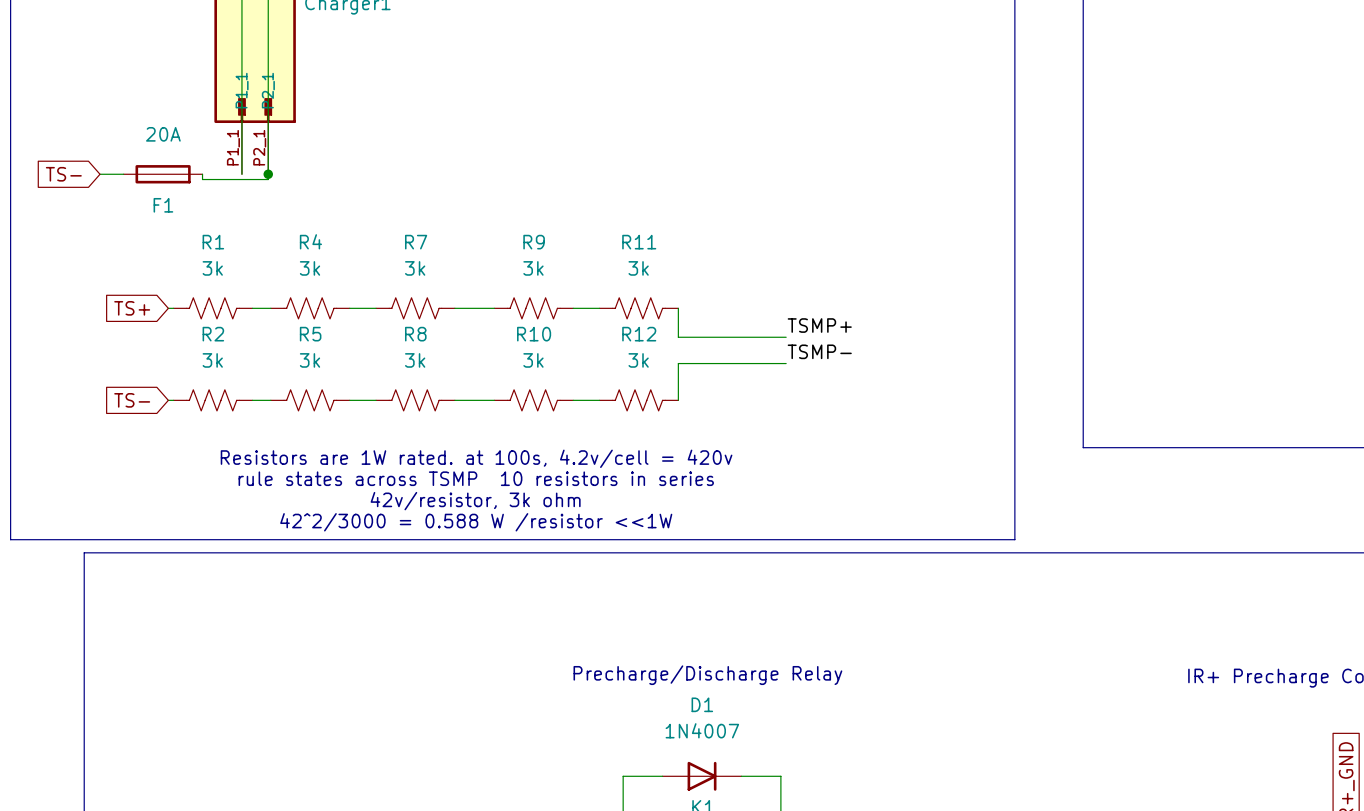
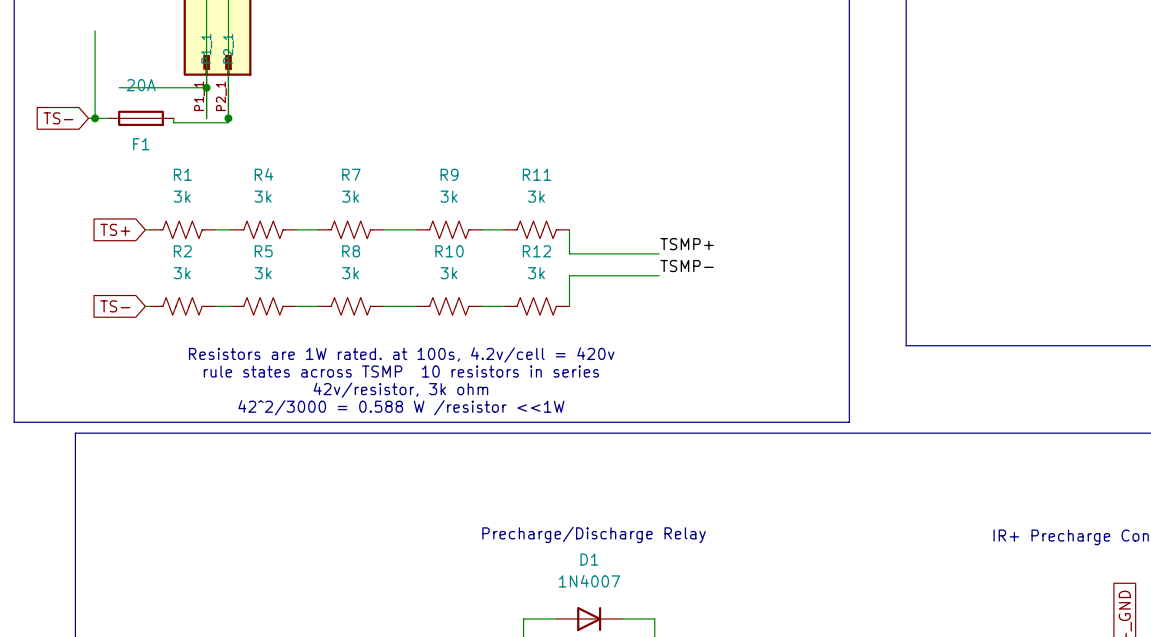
wire: none -> (95, 30) (95, 118)
wire: none -> (119, 87) (206, 87)
junction: none -> (206, 87)
junction: none -> (95, 118)

